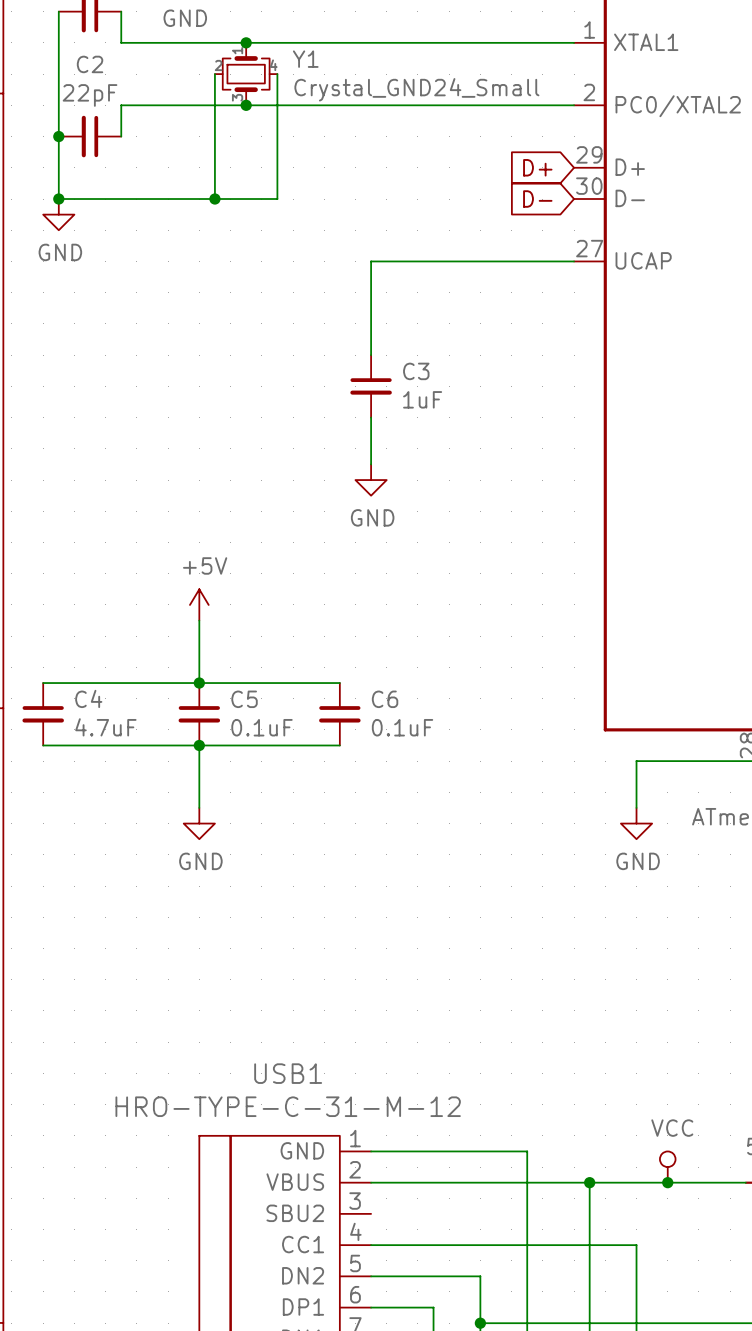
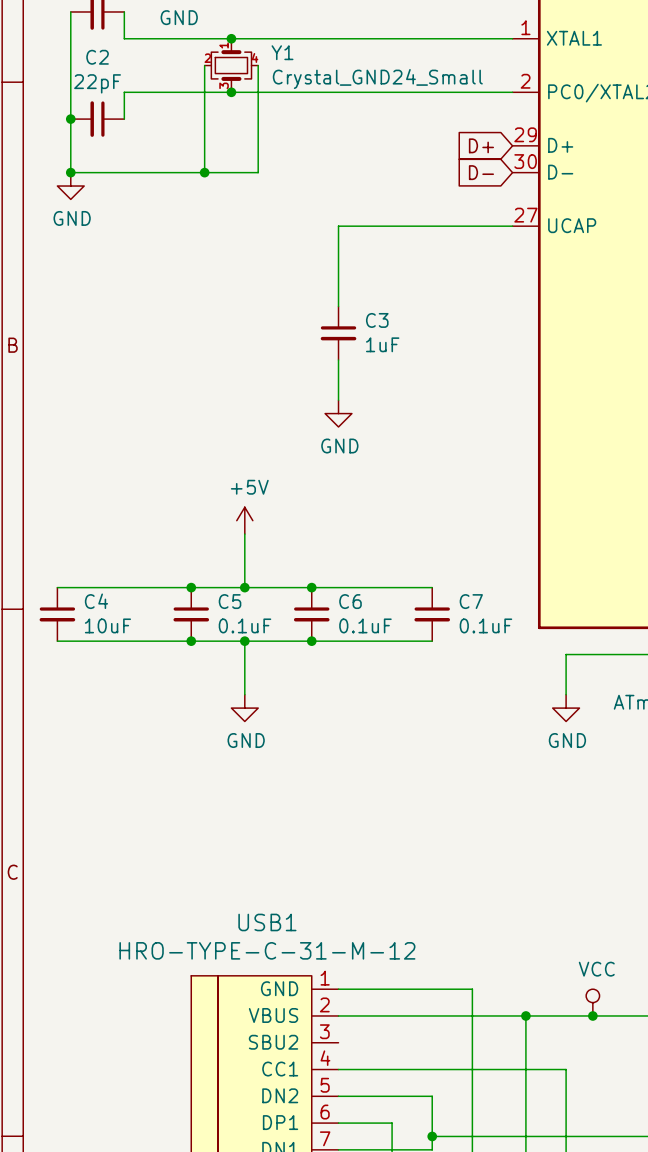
power symbol position: +5V (199, 604) -> +5V (244, 520)
wire: (199, 620) (199, 683) -> (244, 534) (244, 587)
junction: none -> (244, 587)
wire: none -> (311, 587) (432, 587)
junction: none -> (311, 587)
C7: none -> 0.1uF (432, 614)
C4 value: 4.7uF (105, 727) -> 10uF (107, 625)
wire: (199, 745) (199, 807) -> (244, 641) (244, 694)
junction: none -> (244, 641)
wire: none -> (311, 641) (432, 641)
junction: none -> (311, 641)
power symbol position: GND (199, 823) -> GND (244, 708)

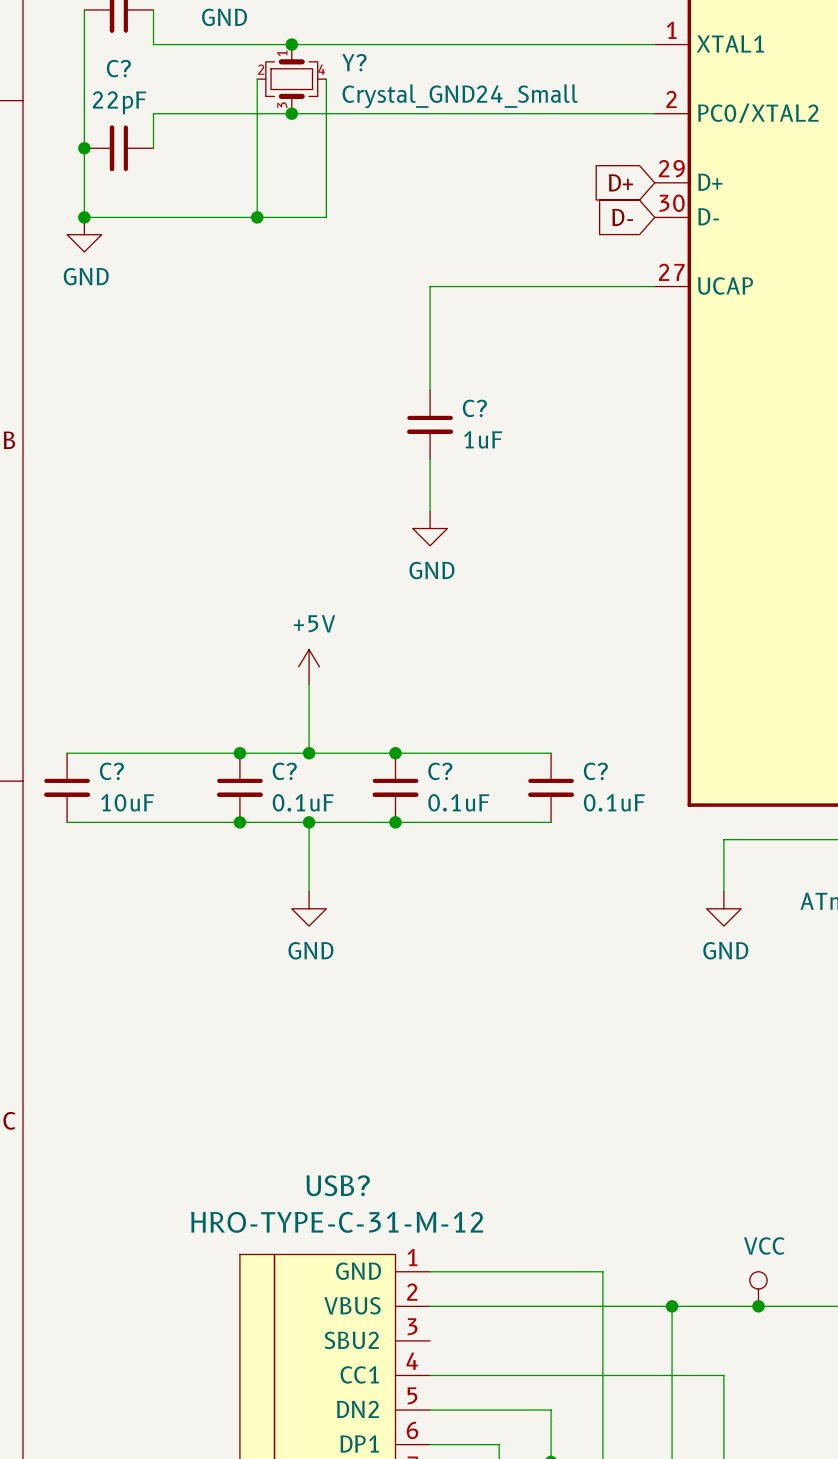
Y1 name: Y1 (282, 52) -> Y? (354, 62)
C2 name: C2 (97, 57) -> C? (118, 68)
C3 name: C3 (377, 320) -> C? (474, 408)
C4 name: C4 (96, 601) -> C? (111, 771)
C5 name: C5 (230, 601) -> C? (284, 771)
C6 name: C6 (350, 601) -> C? (440, 771)
C7 name: C7 (471, 601) -> C? (595, 771)
USB1 name: USB1 (267, 922) -> USB? (338, 1185)

